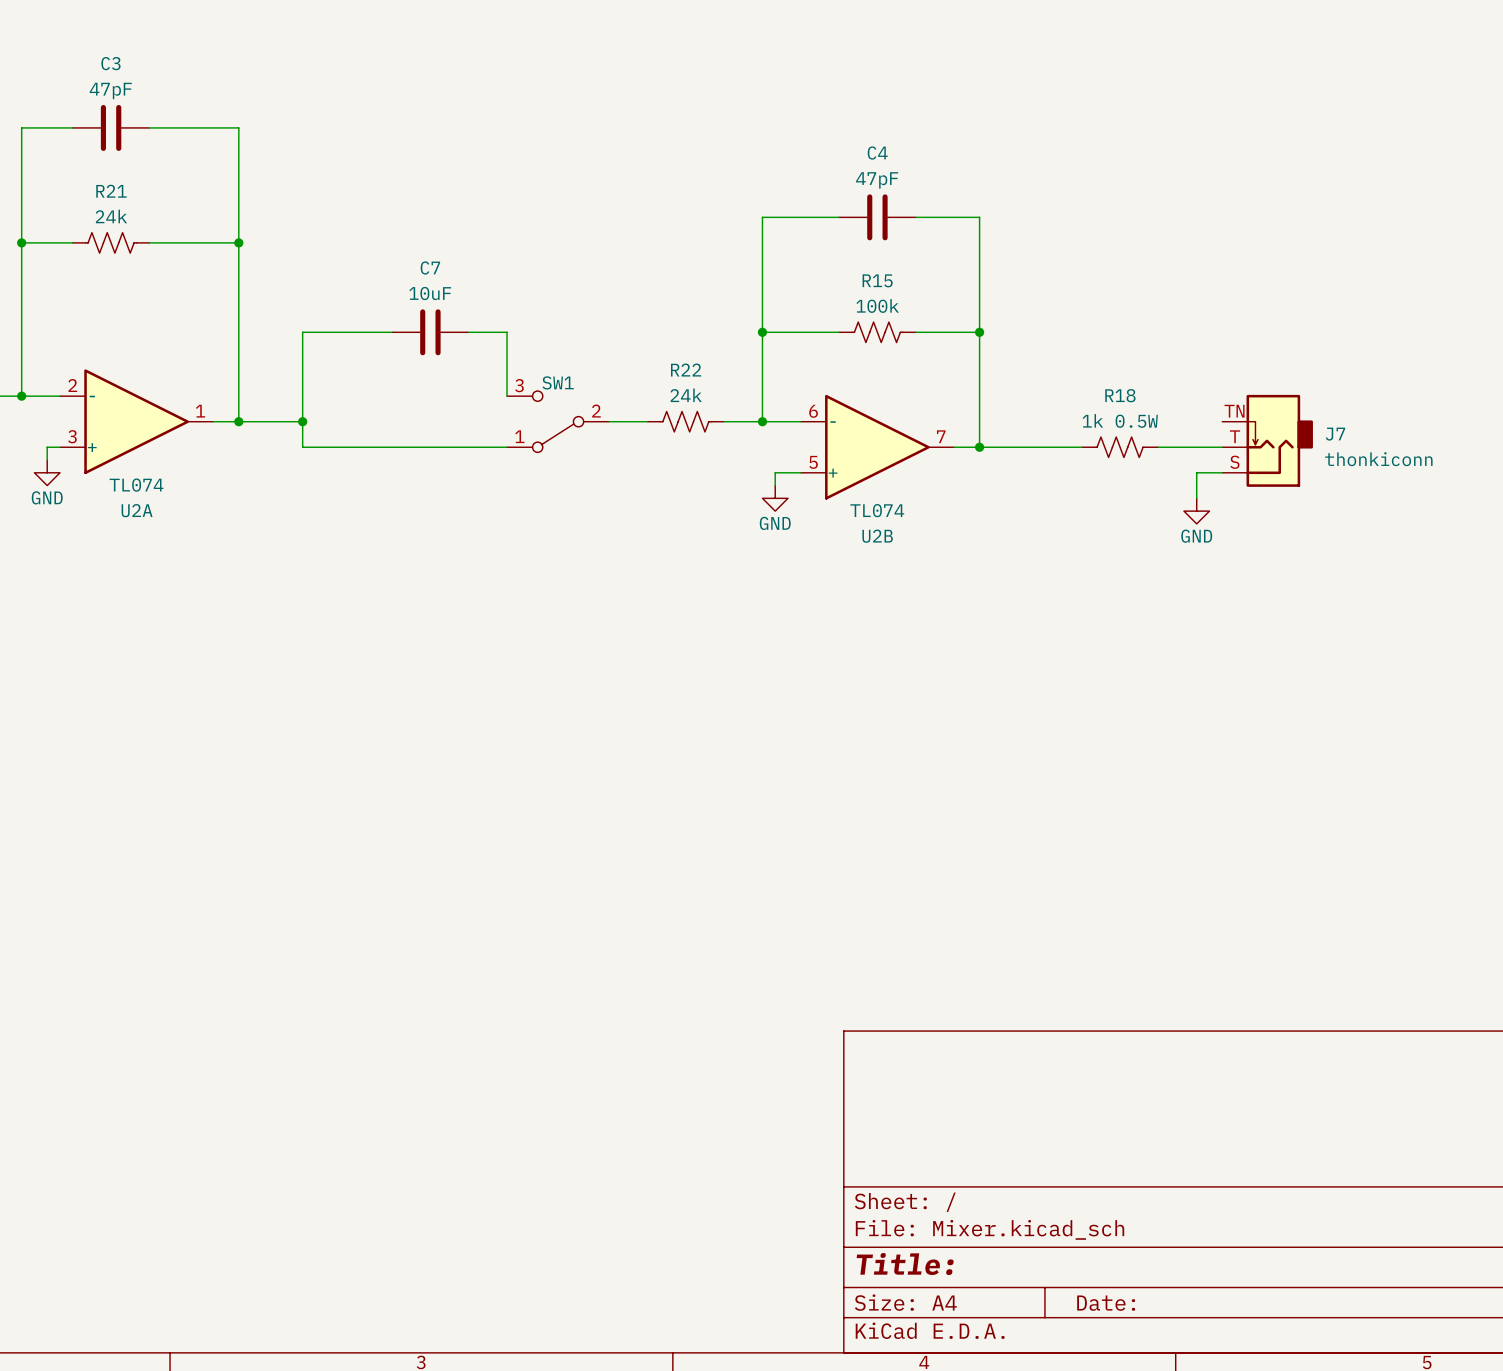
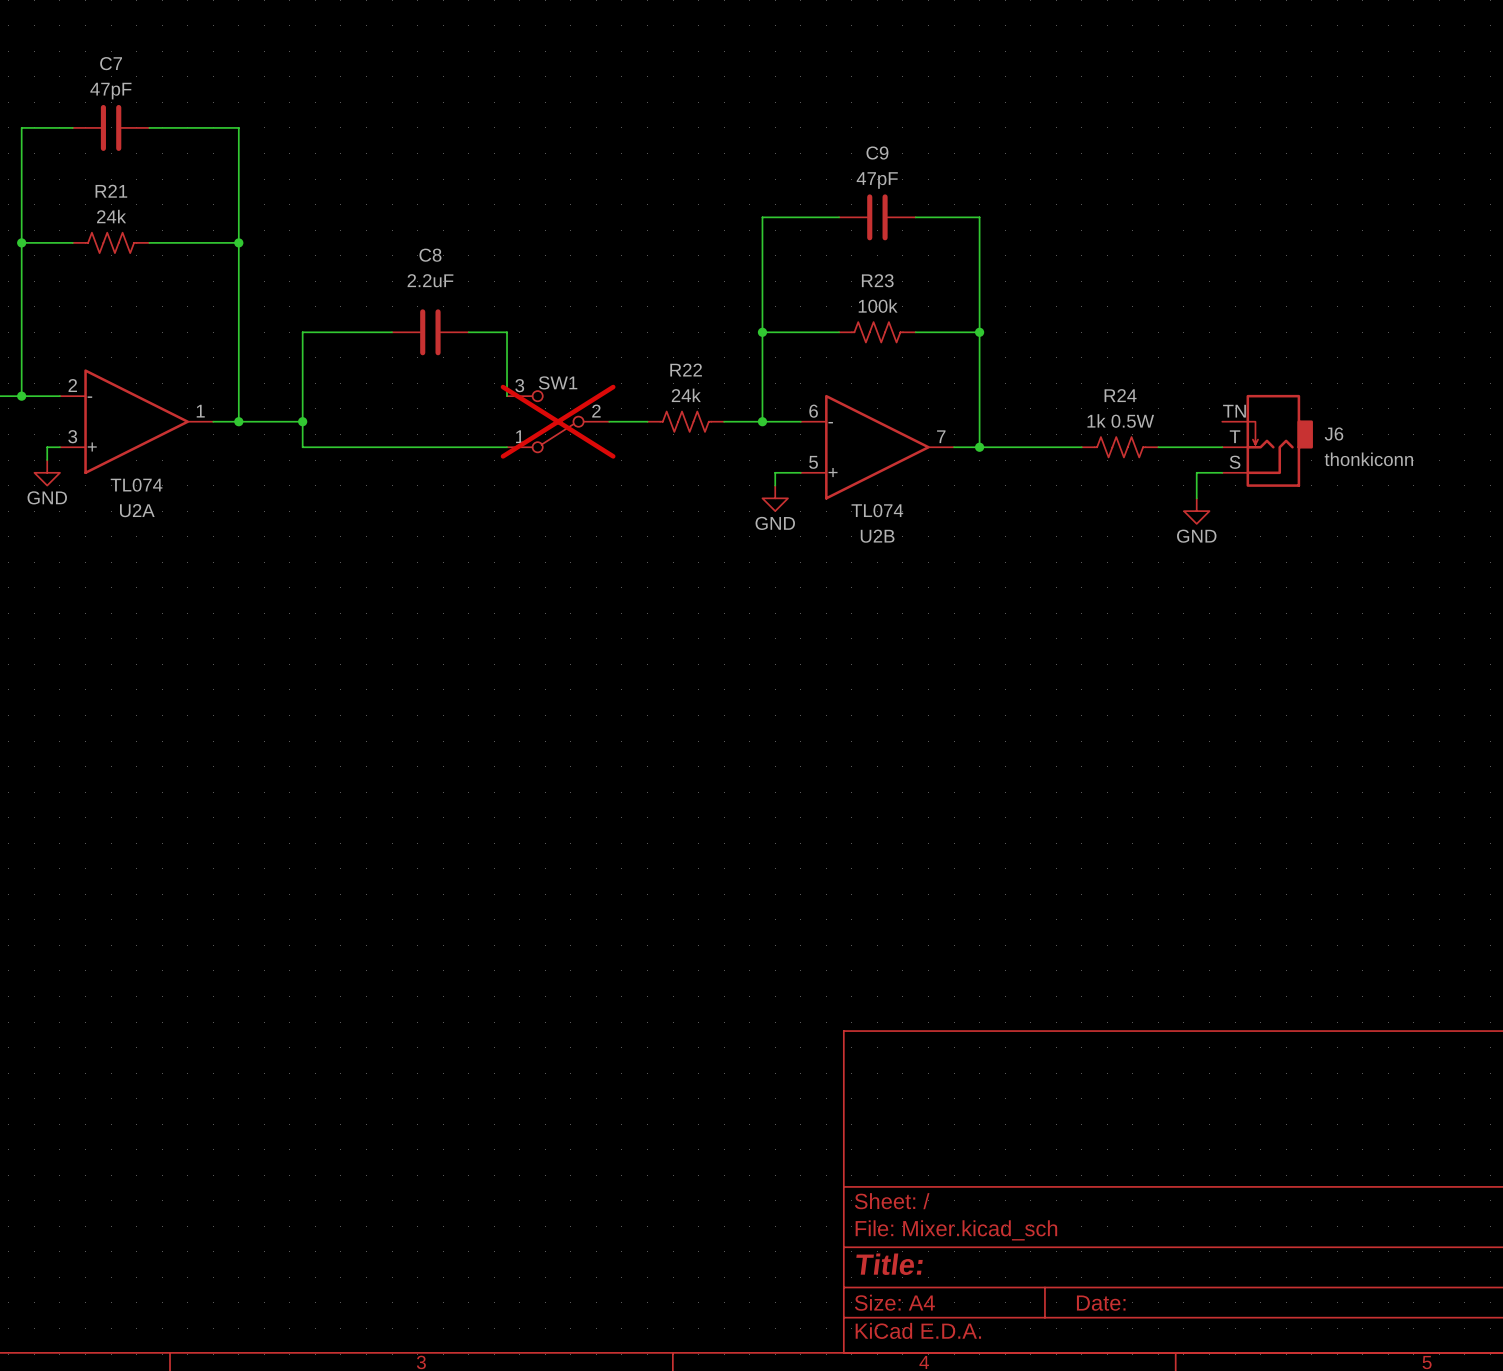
C3 name: C3 (110, 63) -> C7 (111, 63)
C4 name: C4 (877, 153) -> C9 (877, 153)
C7 name: C7 (430, 267) -> C8 (430, 255)
R15 name: R15 (877, 280) -> R23 (877, 280)
C7 value: 10uF (430, 293) -> 2.2uF (430, 280)
R18 name: R18 (1120, 395) -> R24 (1120, 395)
SW1 do-not-place cross: none -> (558, 421)
J7 name: J7 (1335, 434) -> J6 (1333, 434)

